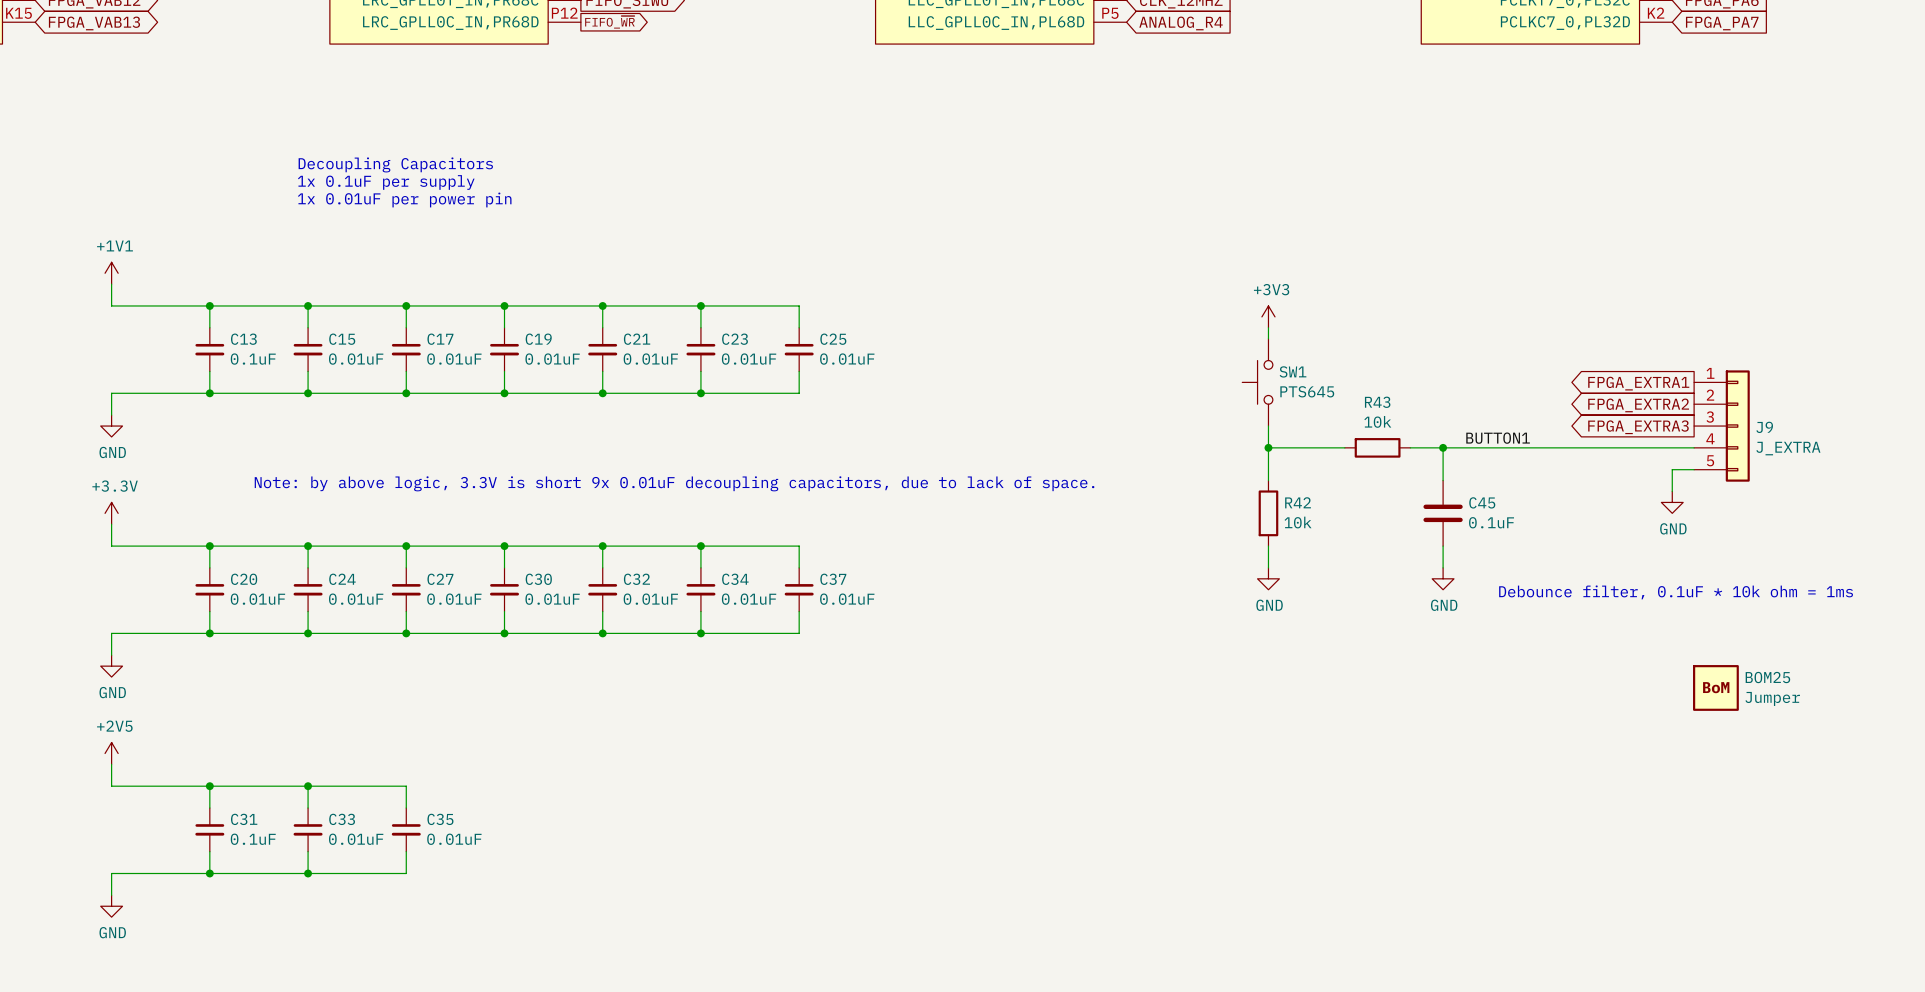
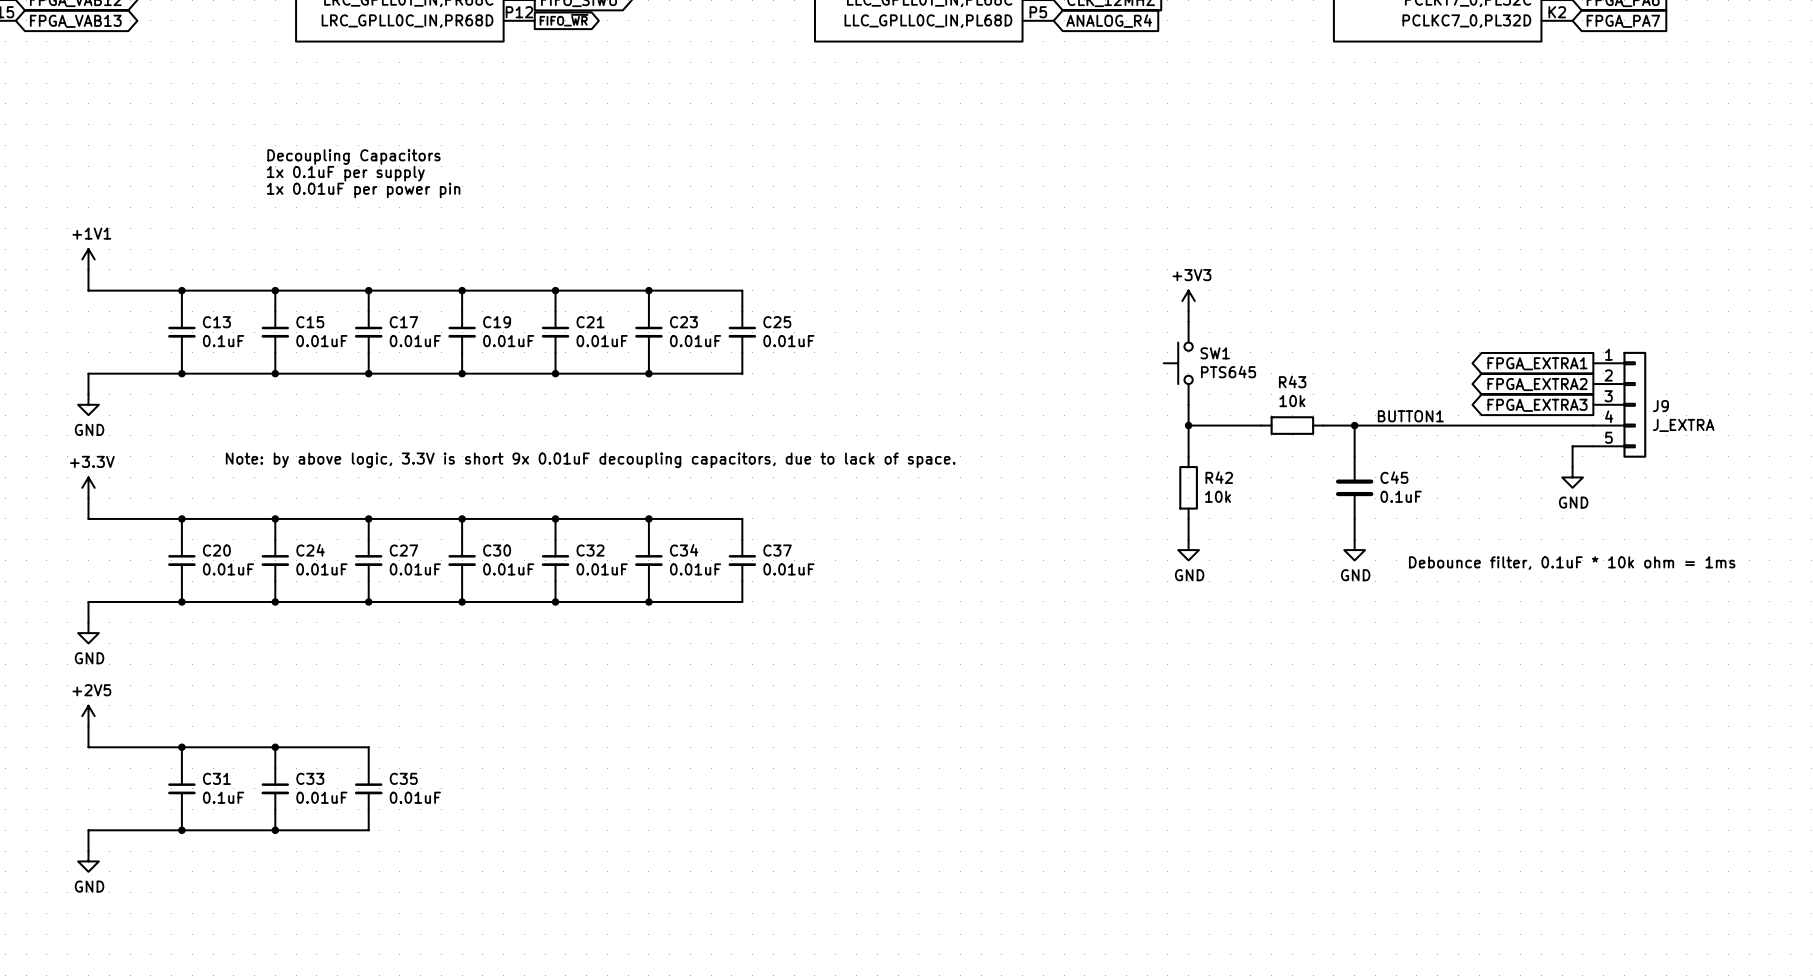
BOM25: Jumper (1715, 687) -> none

